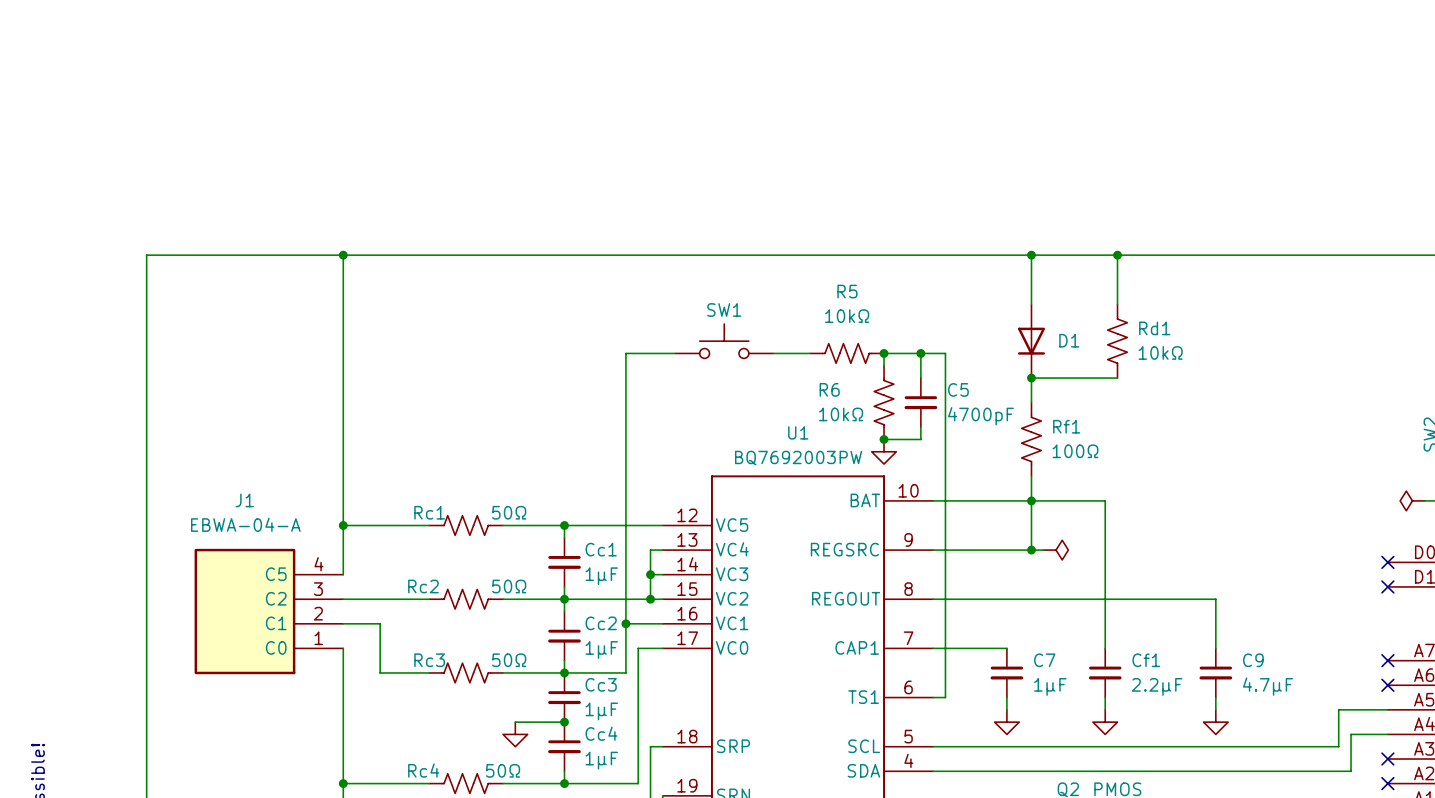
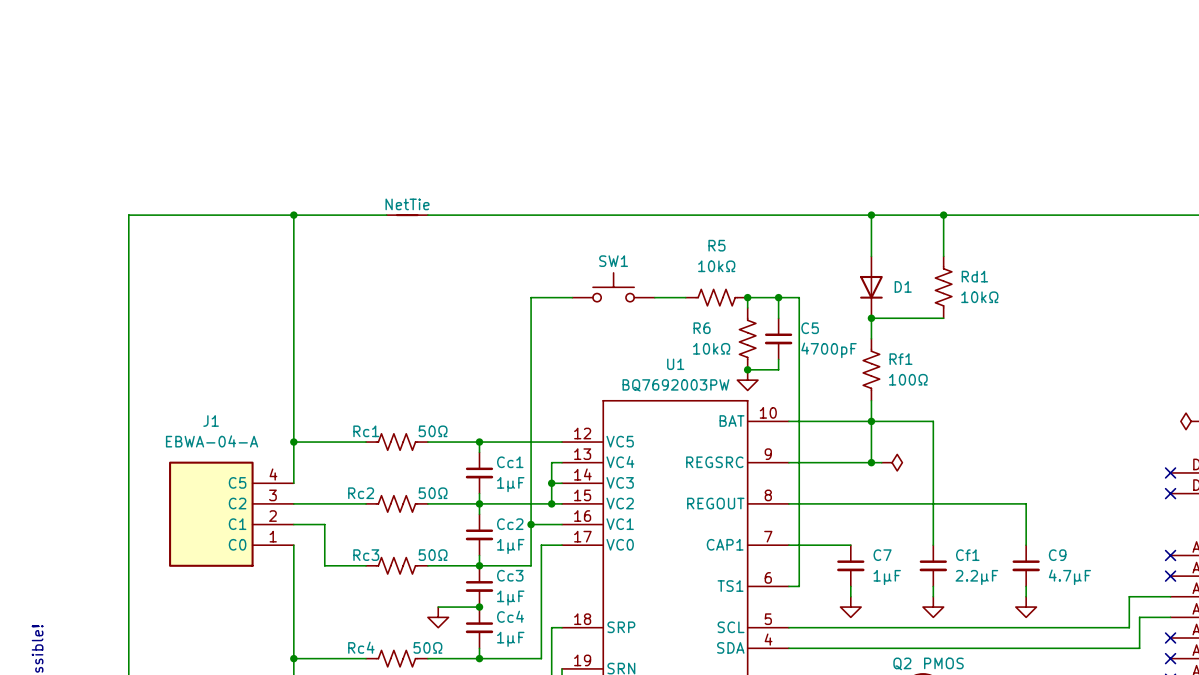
part: none -> NetTie (407, 215)

